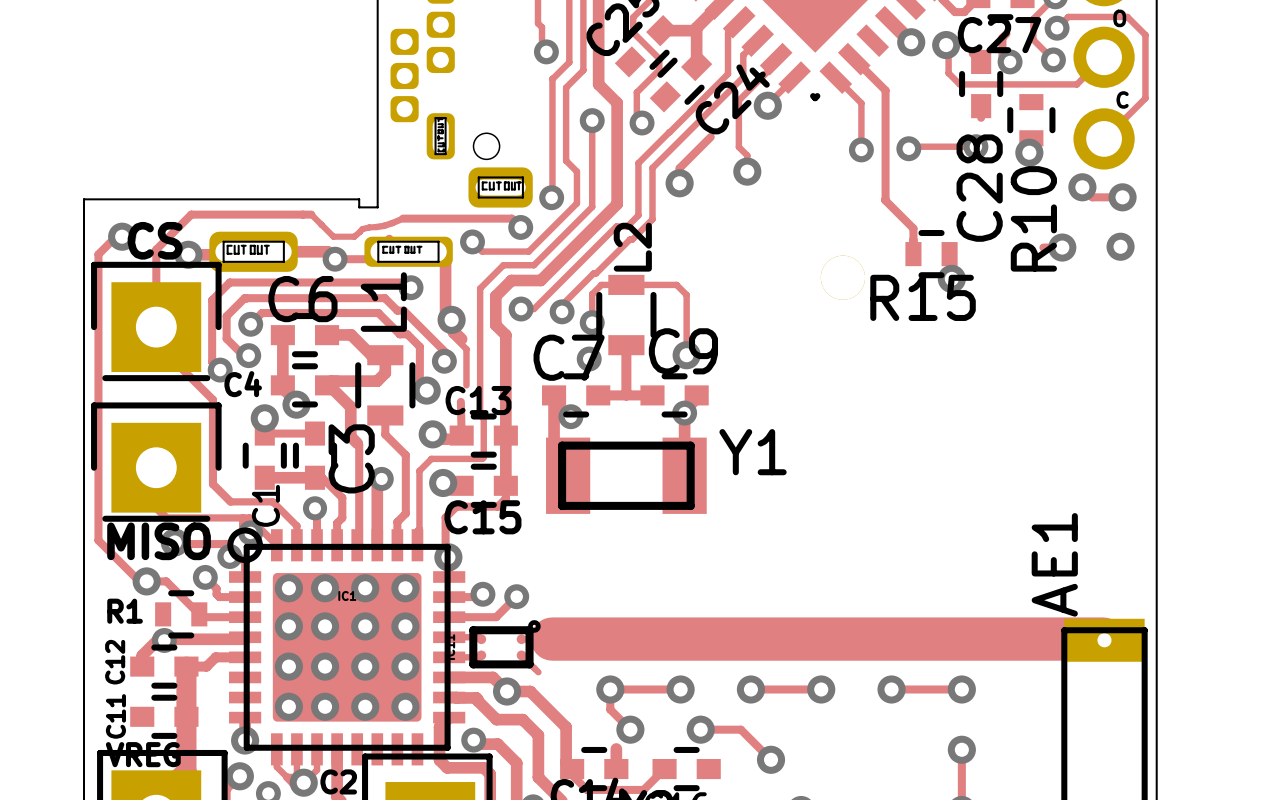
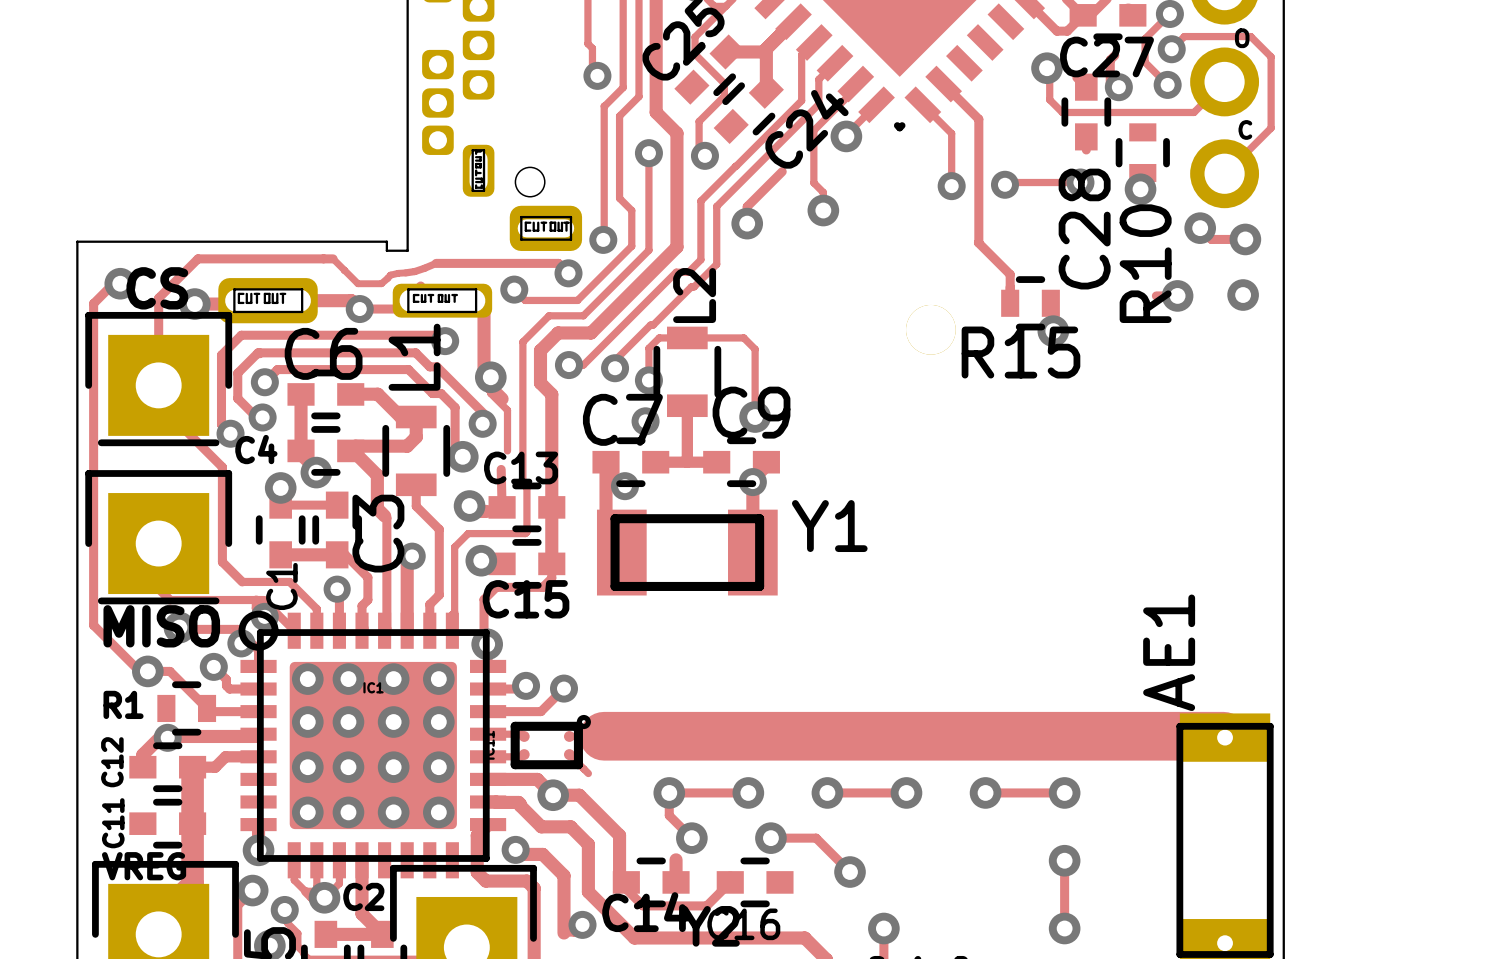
via: (911, 42) -> none

